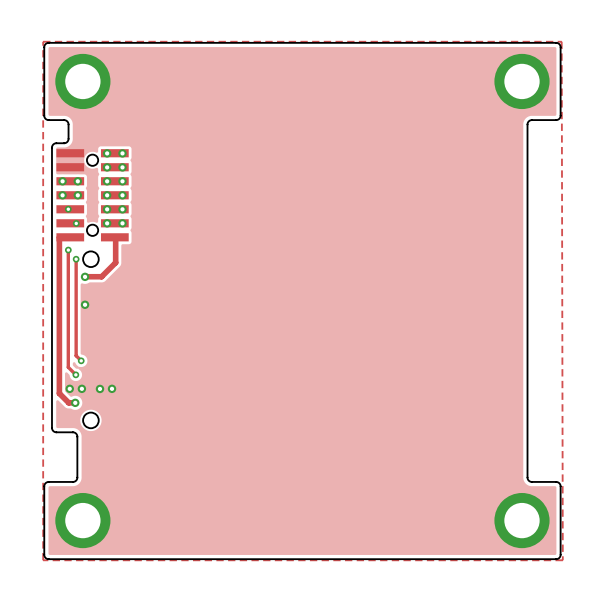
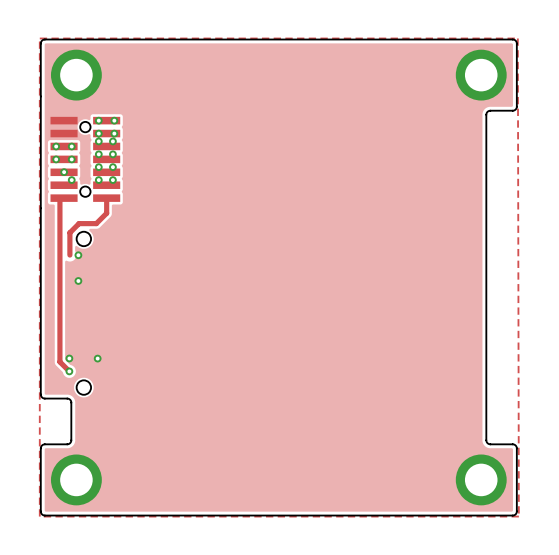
board edge: (44, 115) (47, 119) (65, 120) (68, 124) (67, 141) (54, 143) (51, 147) (51, 427) (56, 432) -> (40, 106) (40, 394) (43, 398) (52, 398)
via: none -> (98, 120)
via: none -> (114, 120)
via: none -> (98, 133)
via: none -> (114, 133)
via: none -> (56, 146)
via: none -> (71, 146)
via: none -> (56, 159)
via: none -> (71, 159)
part: none -> (85, 159)
via: (62, 181) -> none
via: (77, 181) -> none
via: none -> (64, 172)
via: (62, 195) -> none
part: (92, 195) -> none
via: (68, 209) -> none
via: (107, 209) -> none
via: (122, 209) -> none
track: none -> (106, 198) (106, 213) (96, 223) (79, 223) (69, 232) (69, 255)
via: (76, 223) -> none
via: (107, 223) -> none
via: (122, 223) -> none
track: (69, 237) (59, 237) (59, 393) (68, 402) (75, 402) -> (59, 198) (59, 361) (69, 371)
track: (115, 237) (115, 262) (101, 276) (85, 276) -> none
track: (68, 250) (68, 367) (75, 374) -> none
via: (68, 250) -> none
track: (76, 259) (76, 355) (81, 360) -> none
via: (76, 259) -> none
via: (81, 360) -> none
via: (75, 374) -> none
via: (69, 388) -> none
via: none -> (69, 358)
via: (81, 388) -> none
via: (99, 388) -> none
via: none -> (97, 358)
via: (112, 388) -> none

